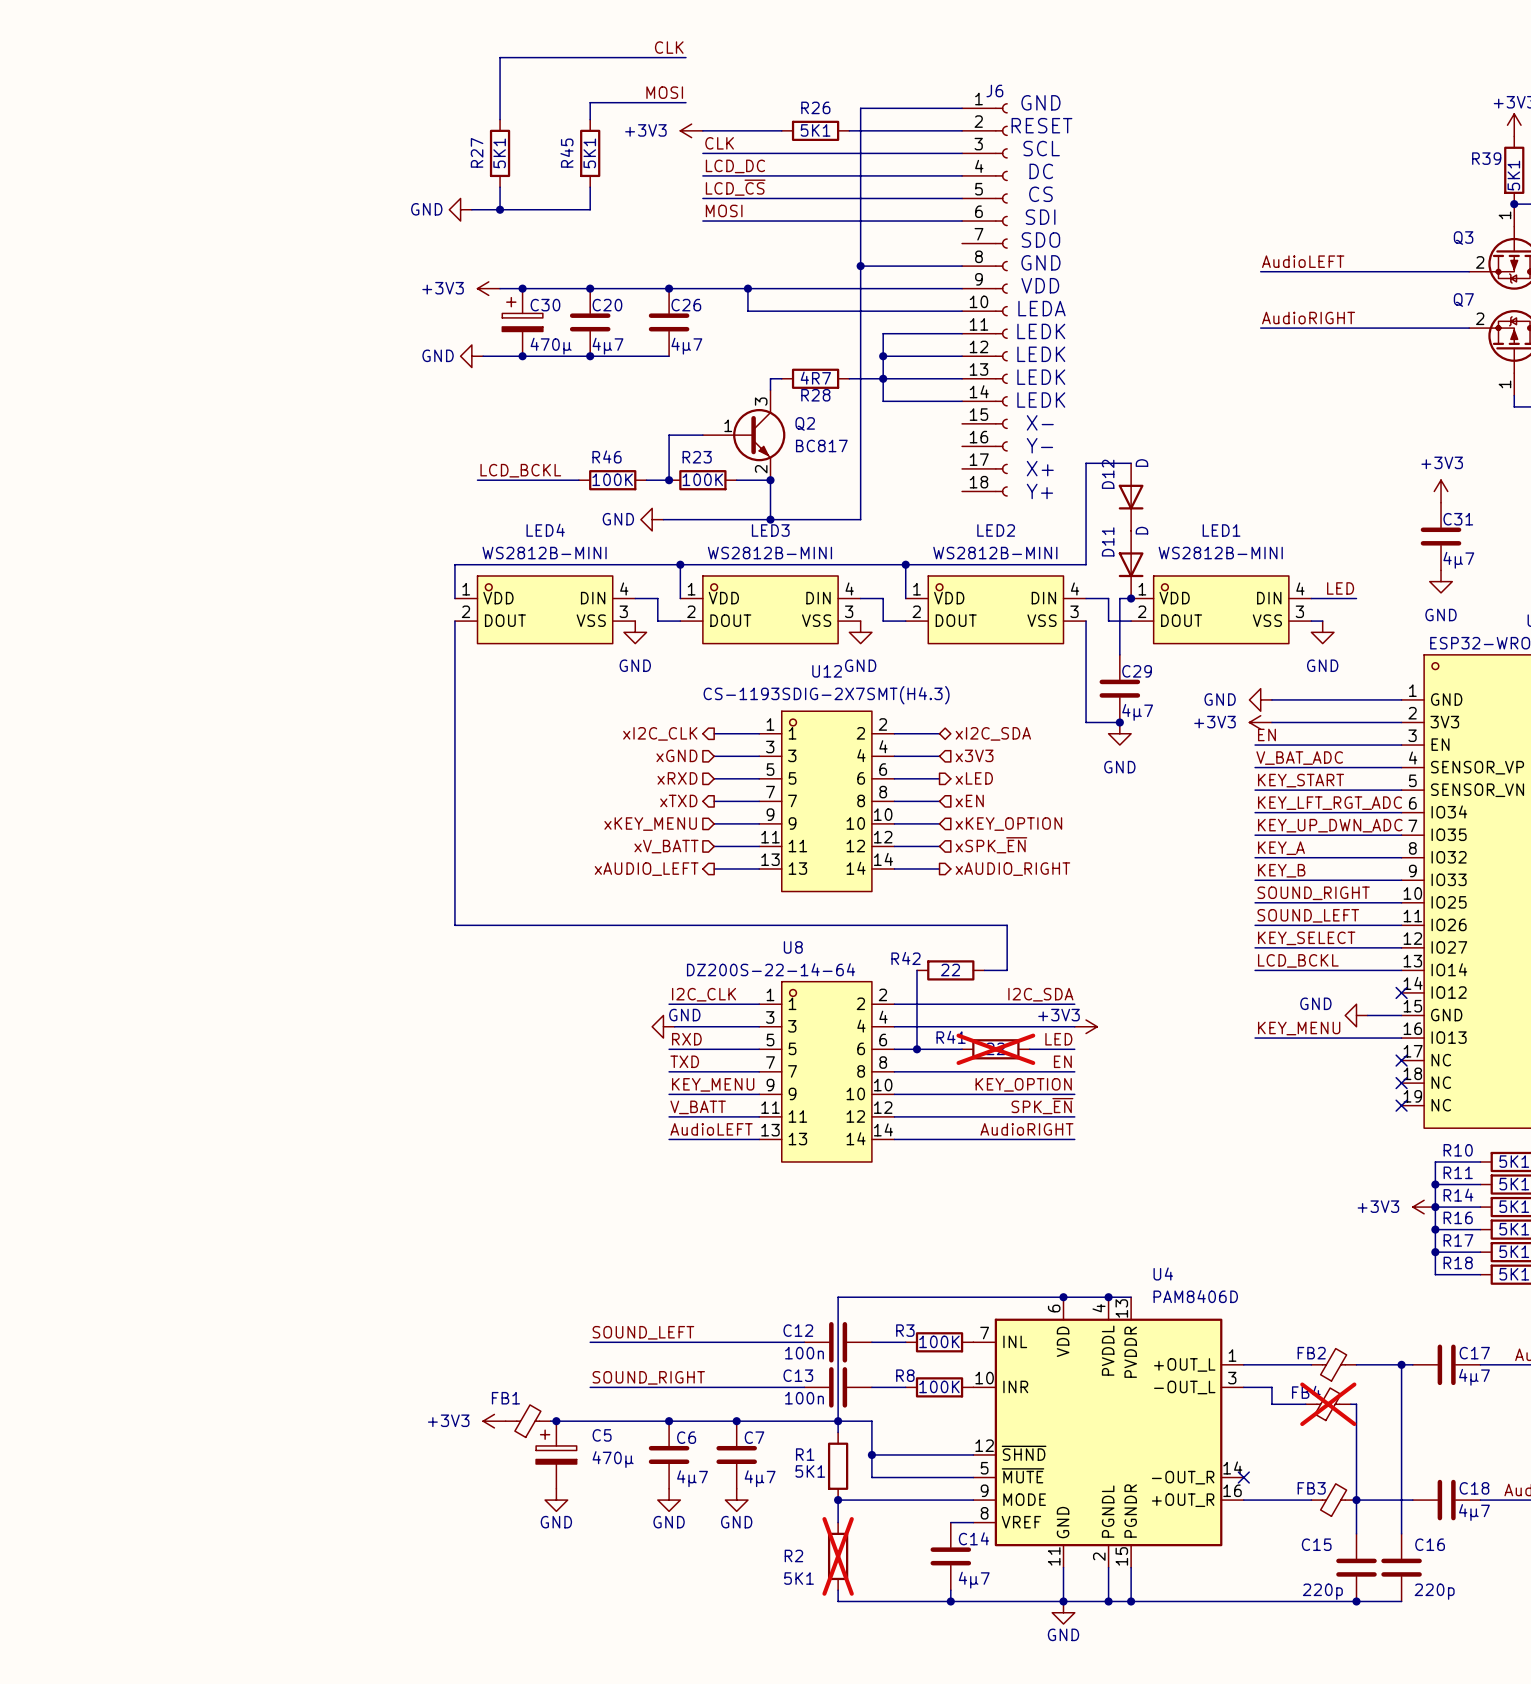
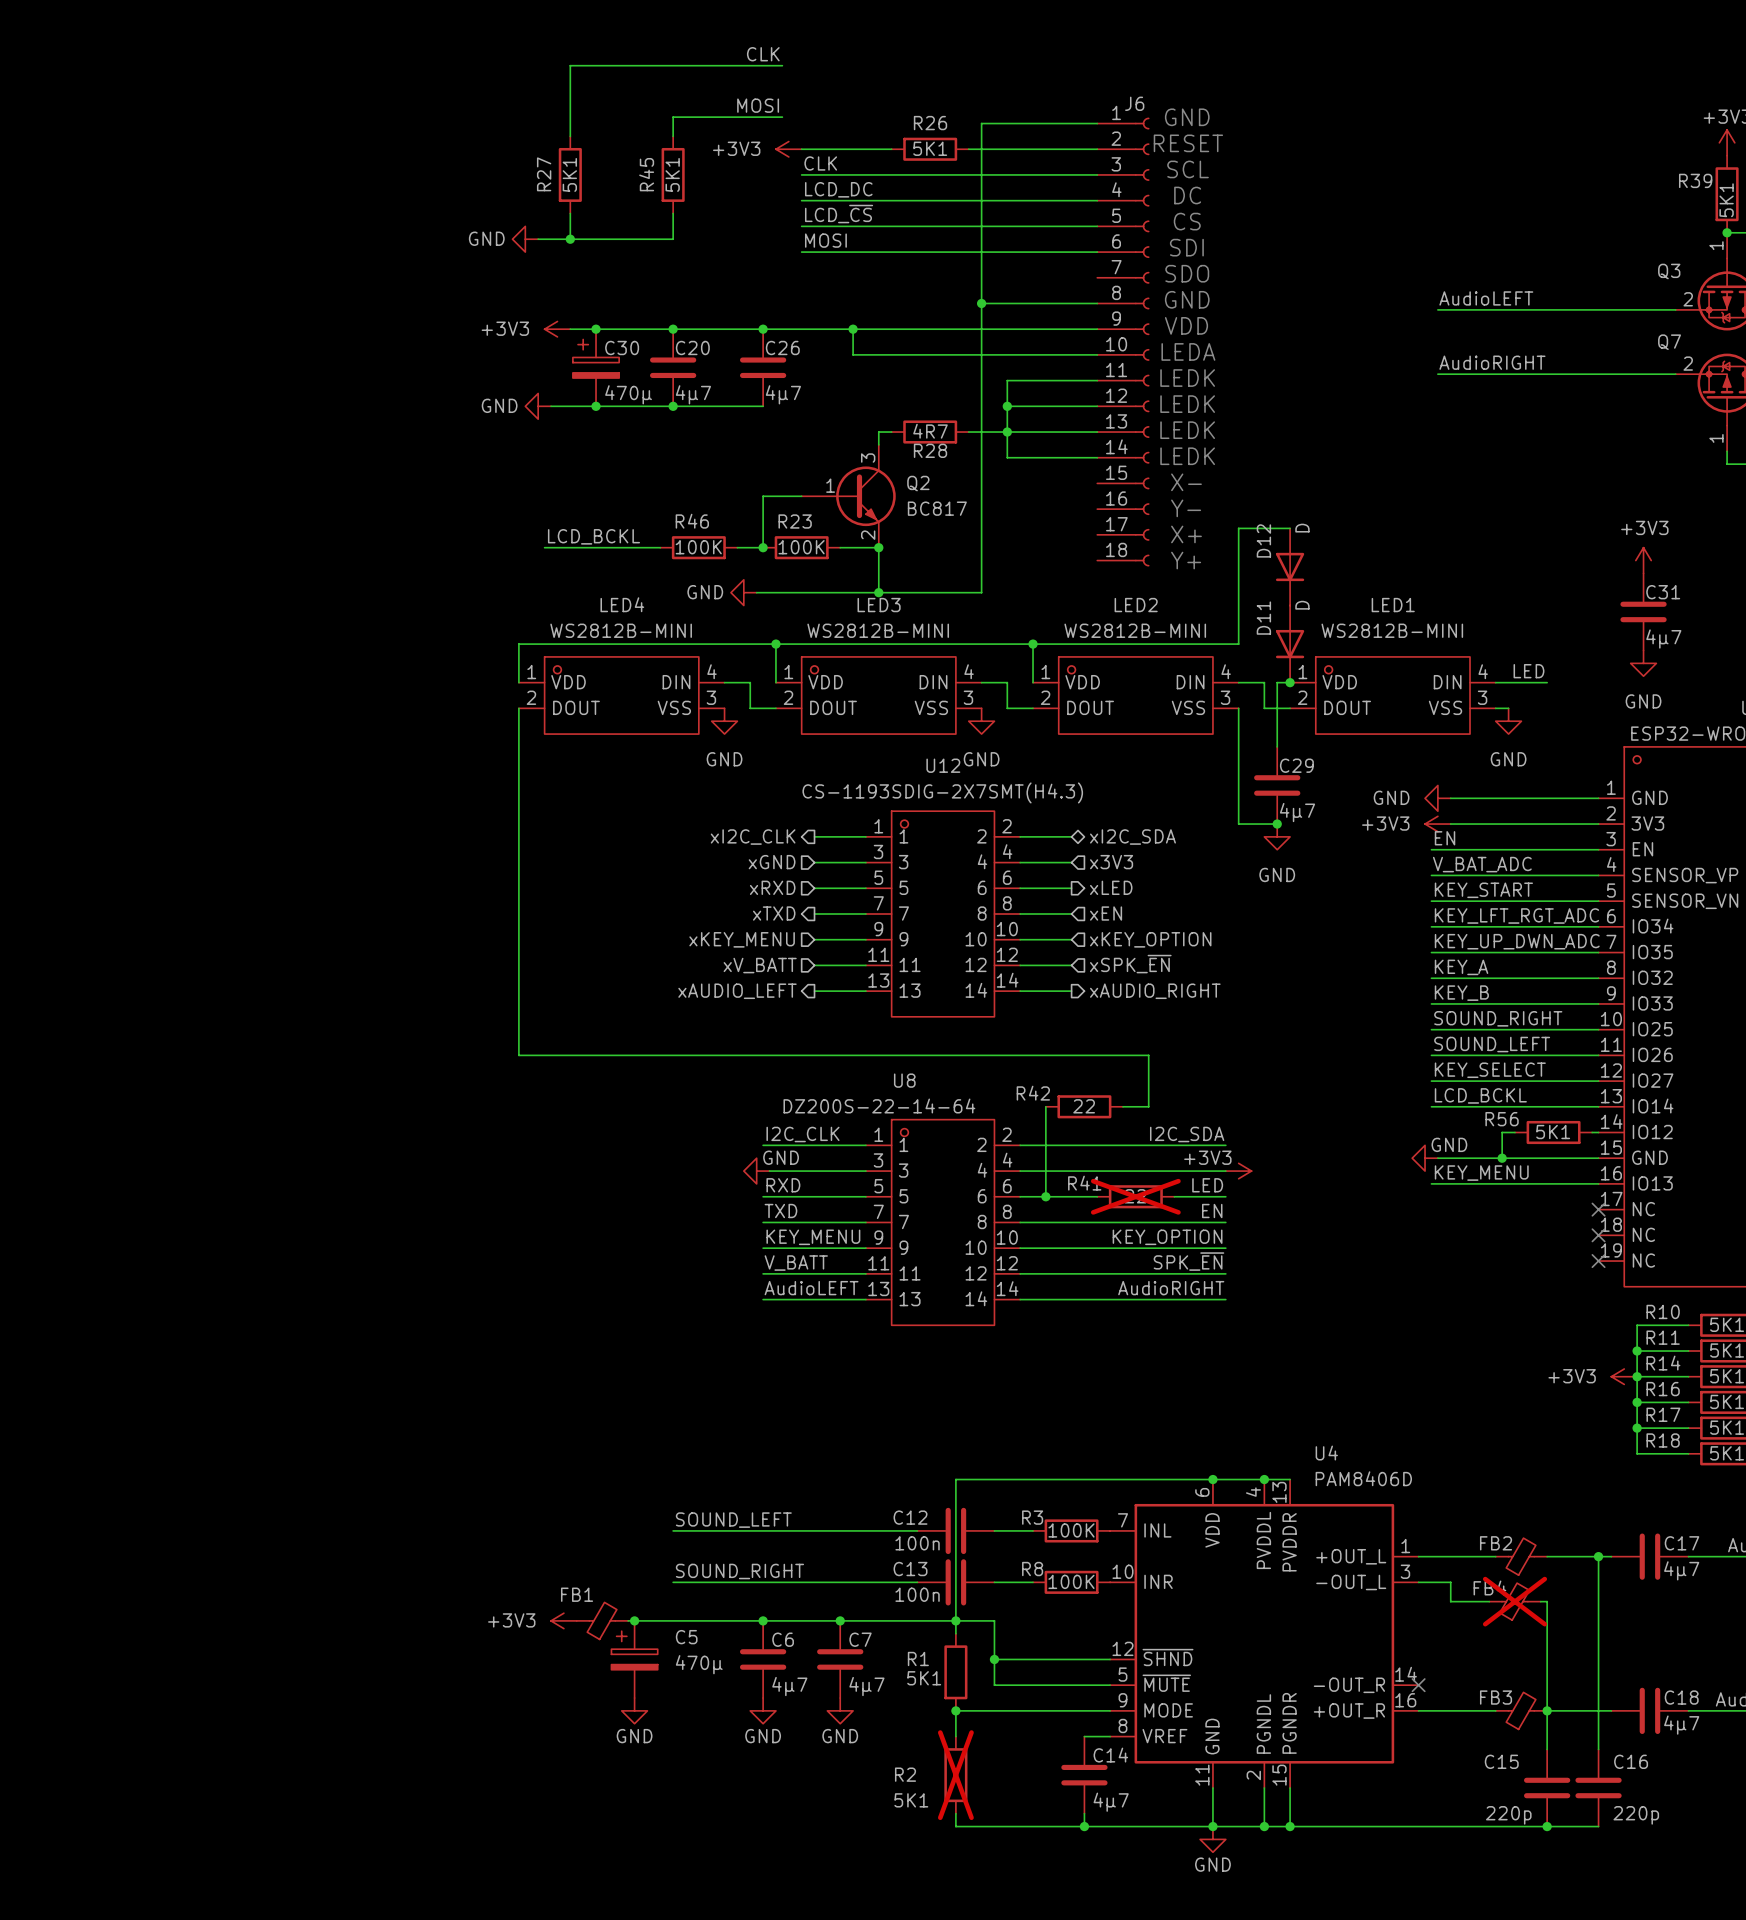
wire: none -> (1515, 1132) (1502, 1132) (1502, 1158)
R56: none -> 5K1 (1553, 1132)
wire: none -> (1592, 1132) (1598, 1132)
no-connect mark: (1401, 992) -> none
power symbol text position: GND (1315, 1003) -> GND (1449, 1144)
wire: none -> (1437, 1158) (1559, 1158)
junction: none -> (1502, 1158)
power symbol position: GND (1356, 1015) -> GND (1425, 1158)

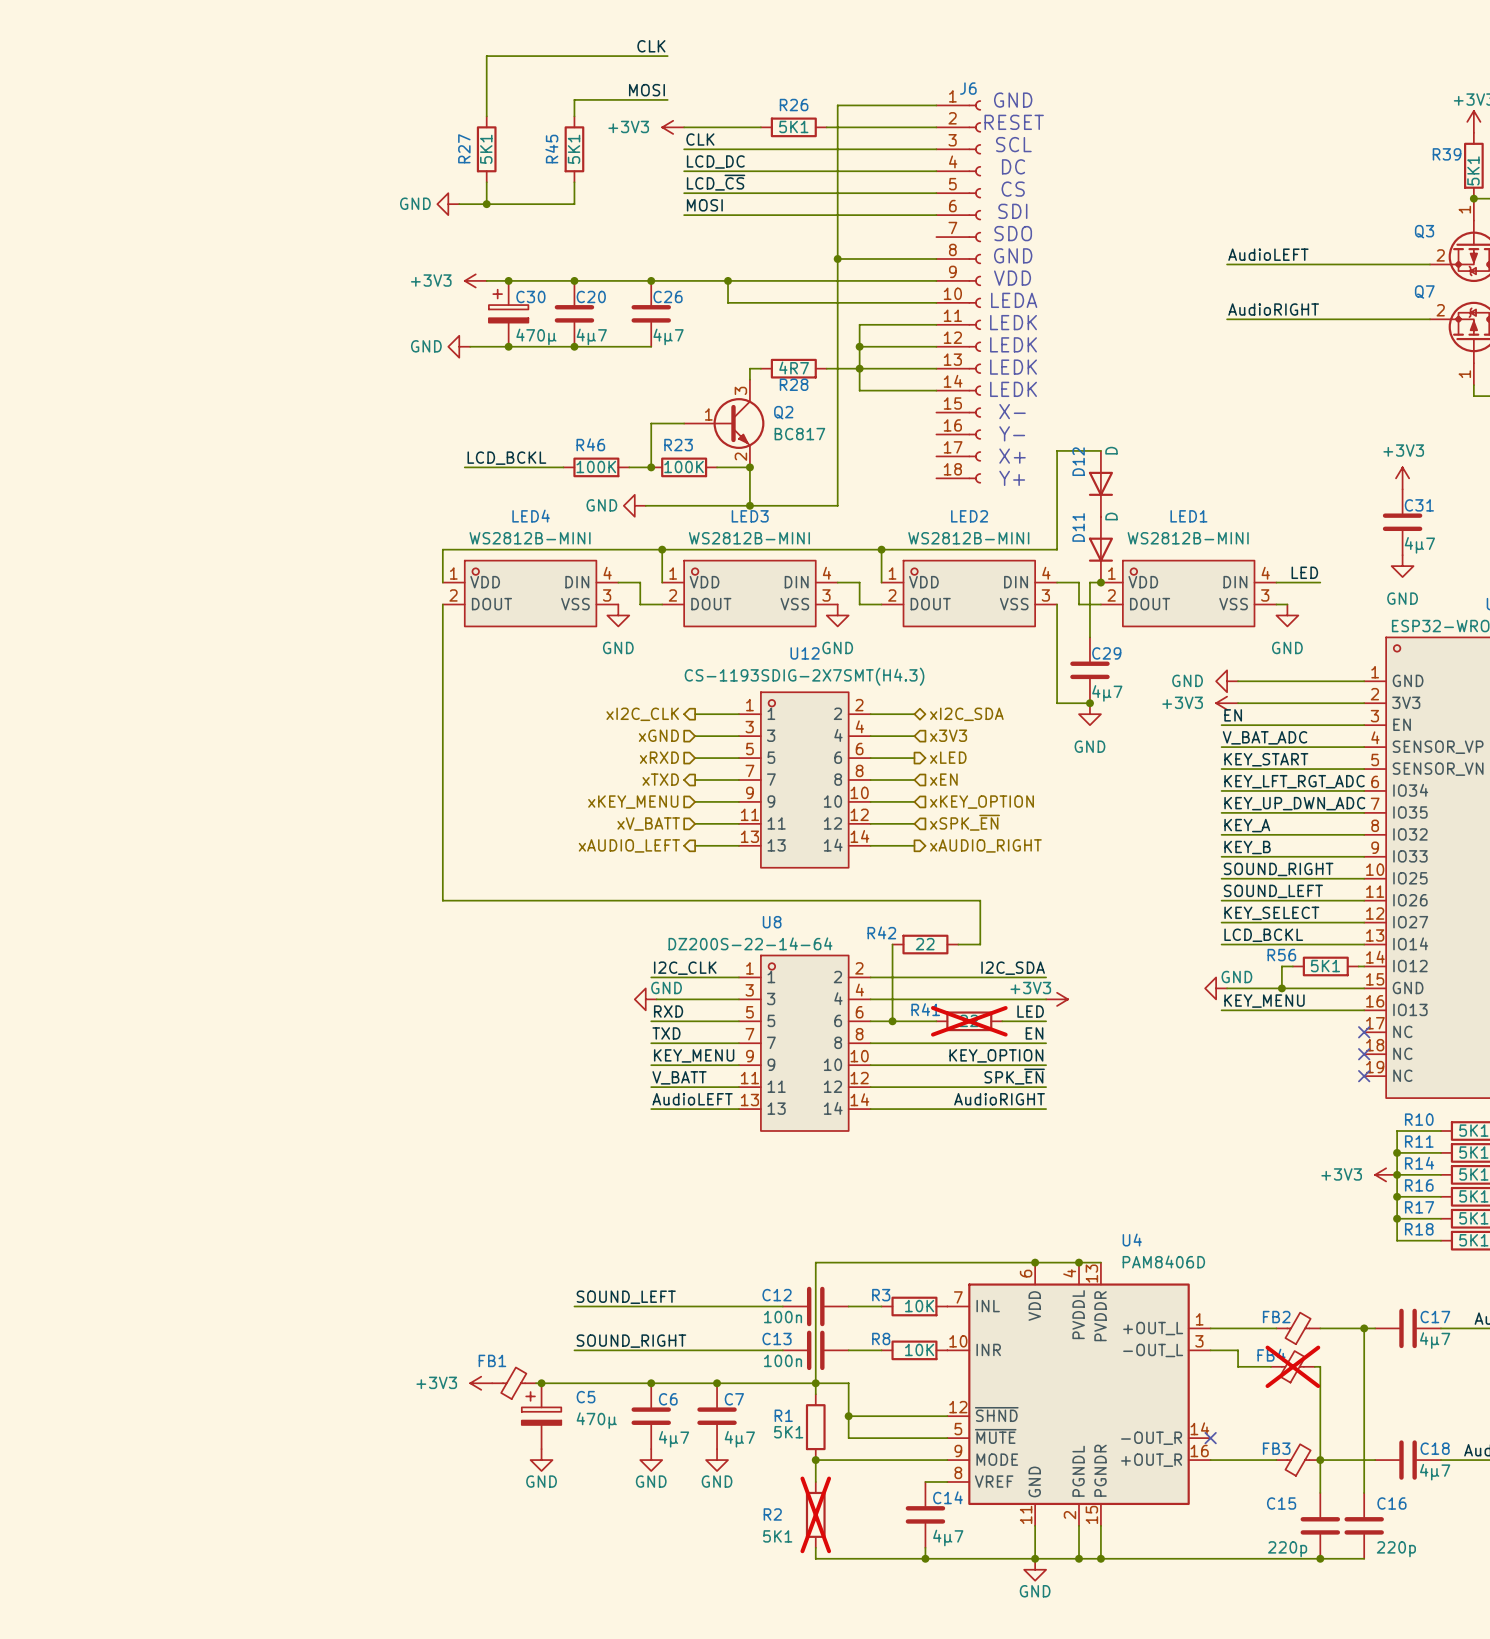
R3 value: 100K (1071, 1530) -> 10K (919, 1306)
R8 value: 100K (1071, 1581) -> 10K (919, 1349)

